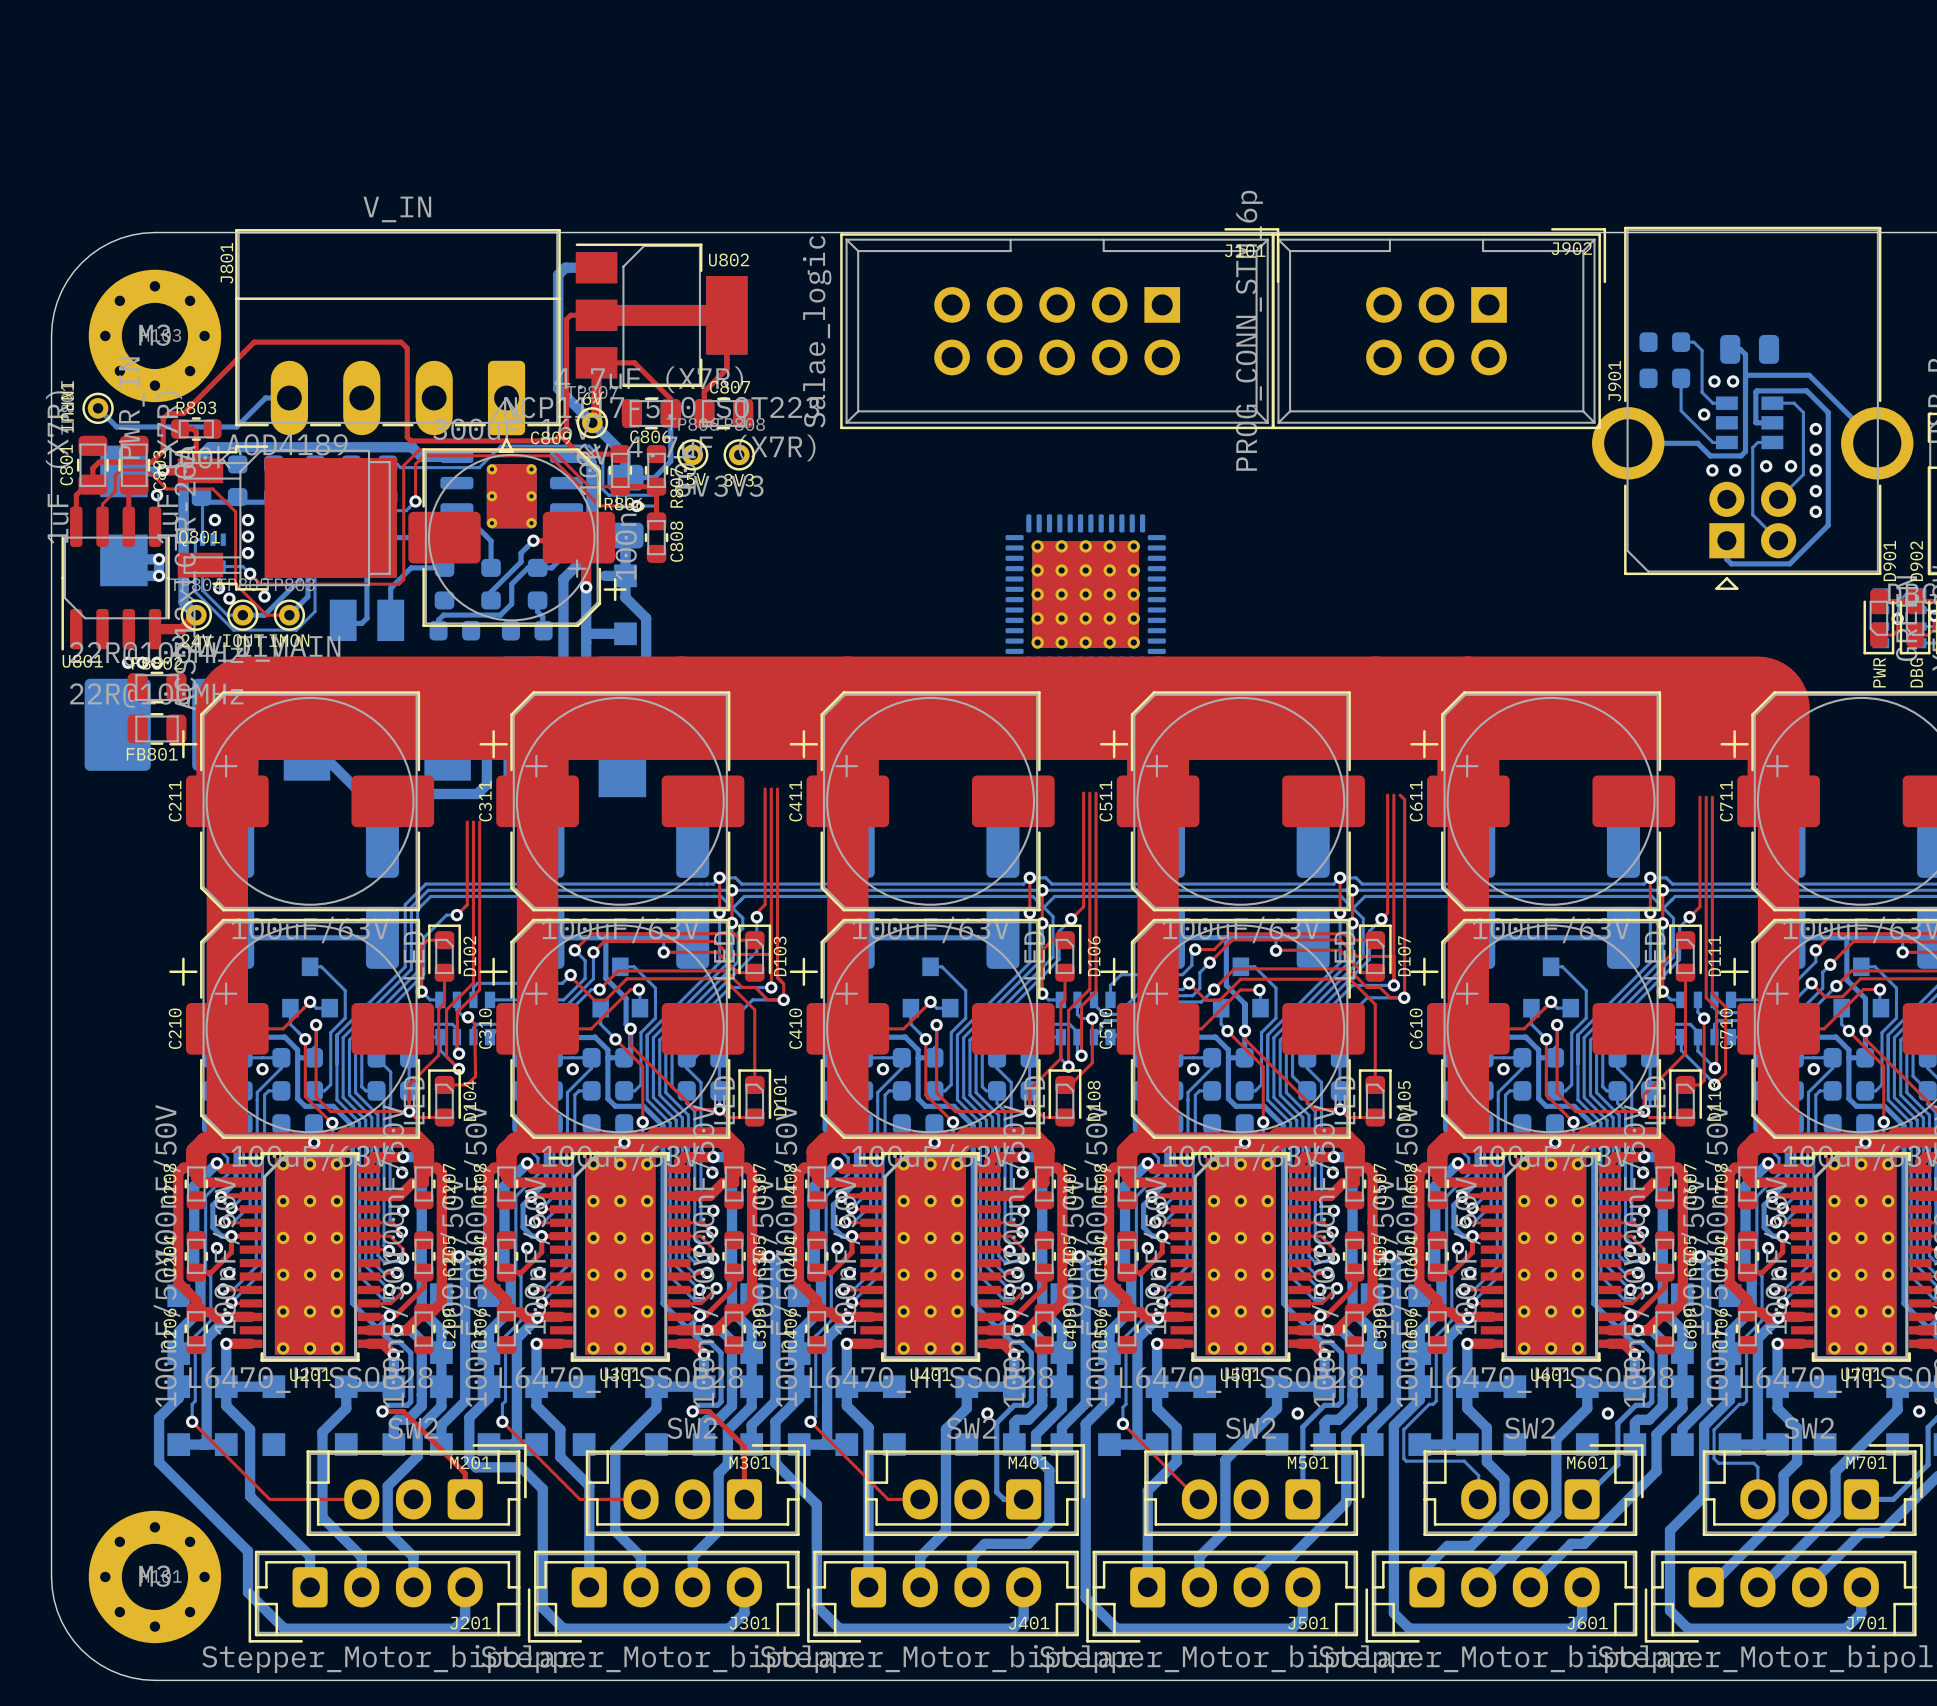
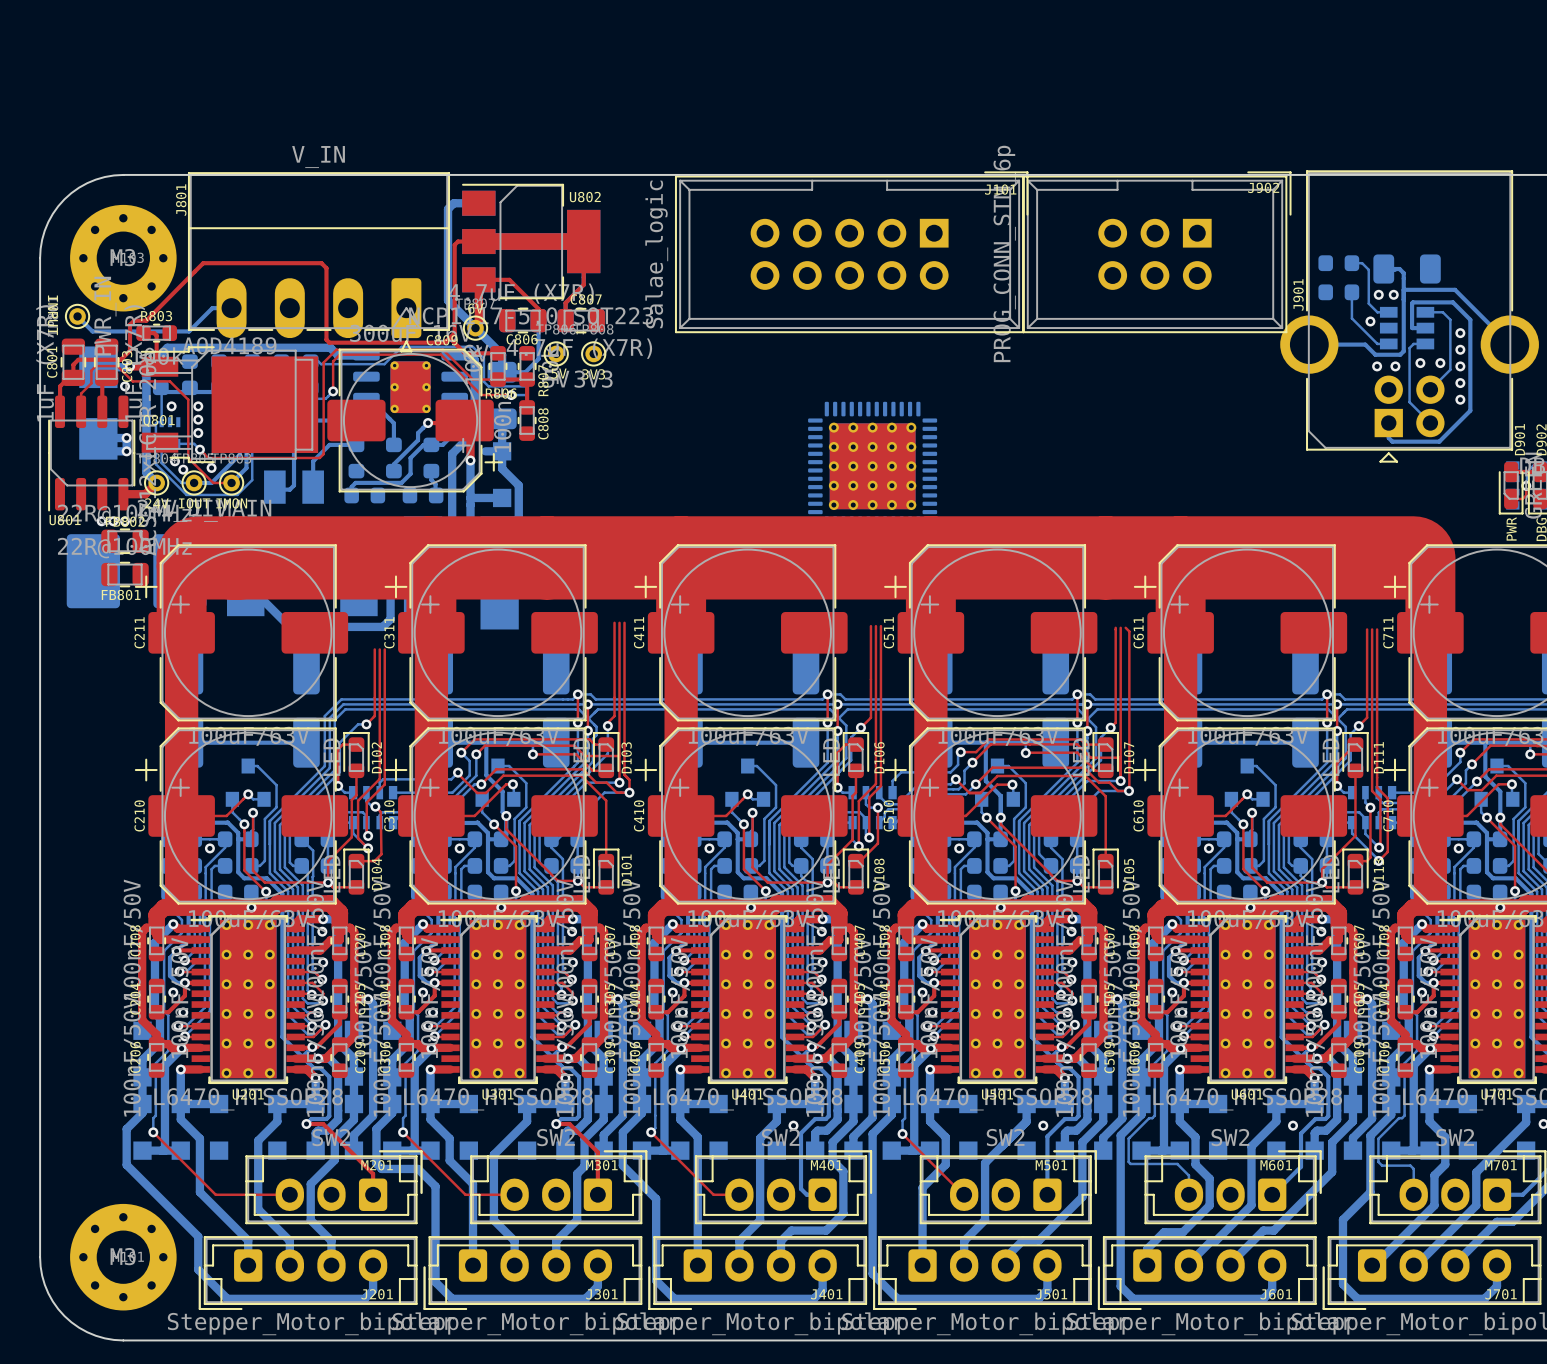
part footprint: [1720, 334, 1780, 364] -> [1373, 254, 1441, 284]

